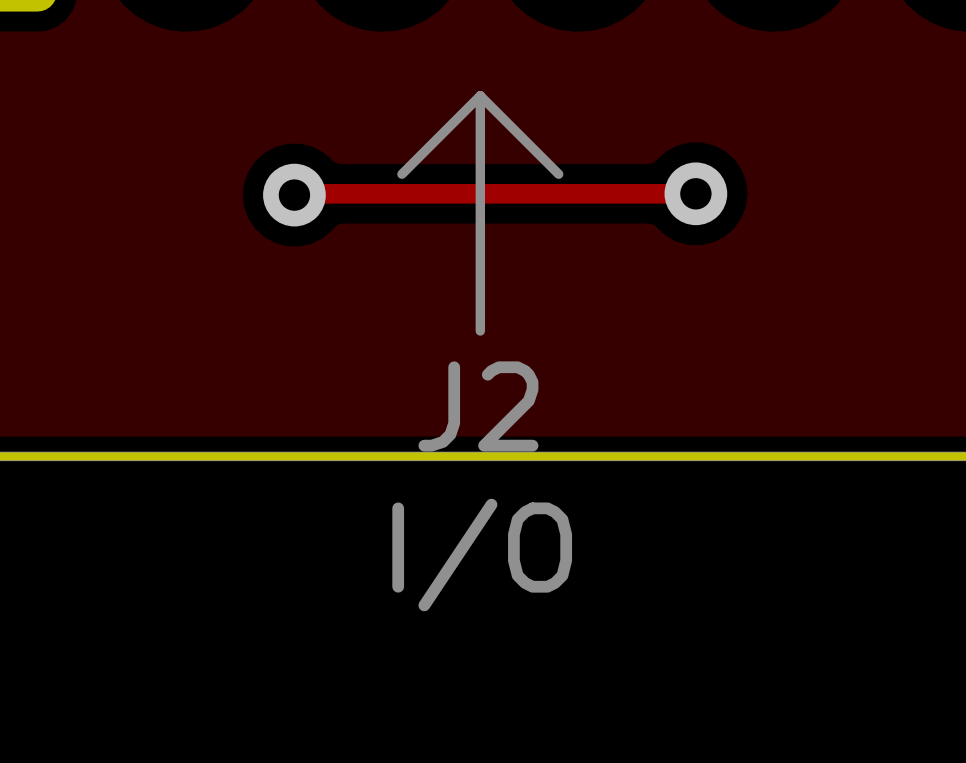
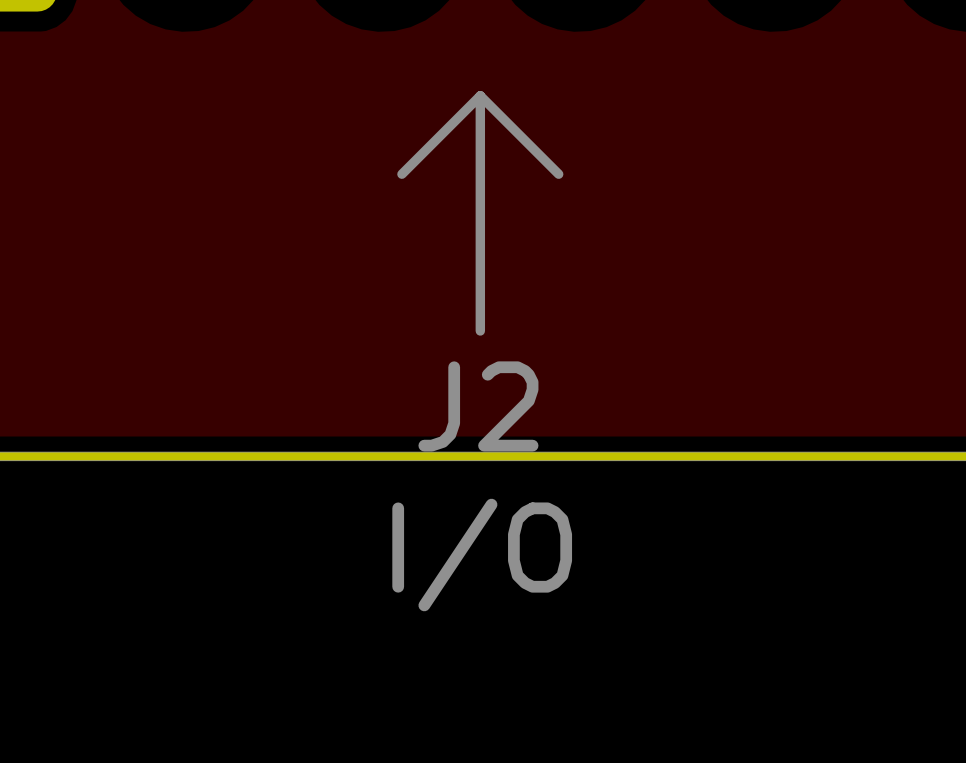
track: (695, 193) (294, 195) -> none
via: (695, 193) -> none
via: (294, 195) -> none

